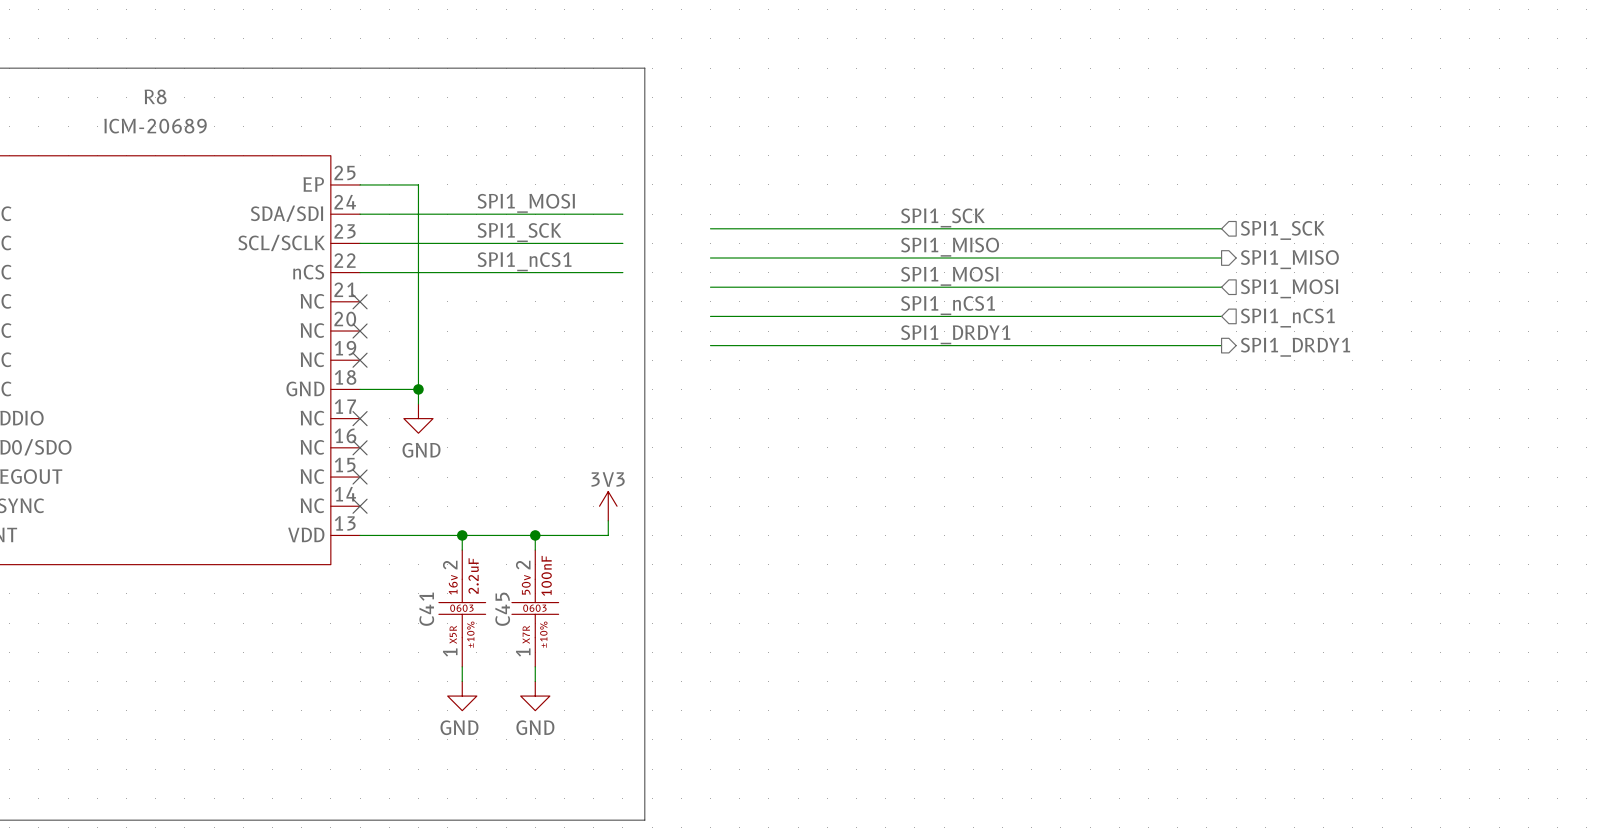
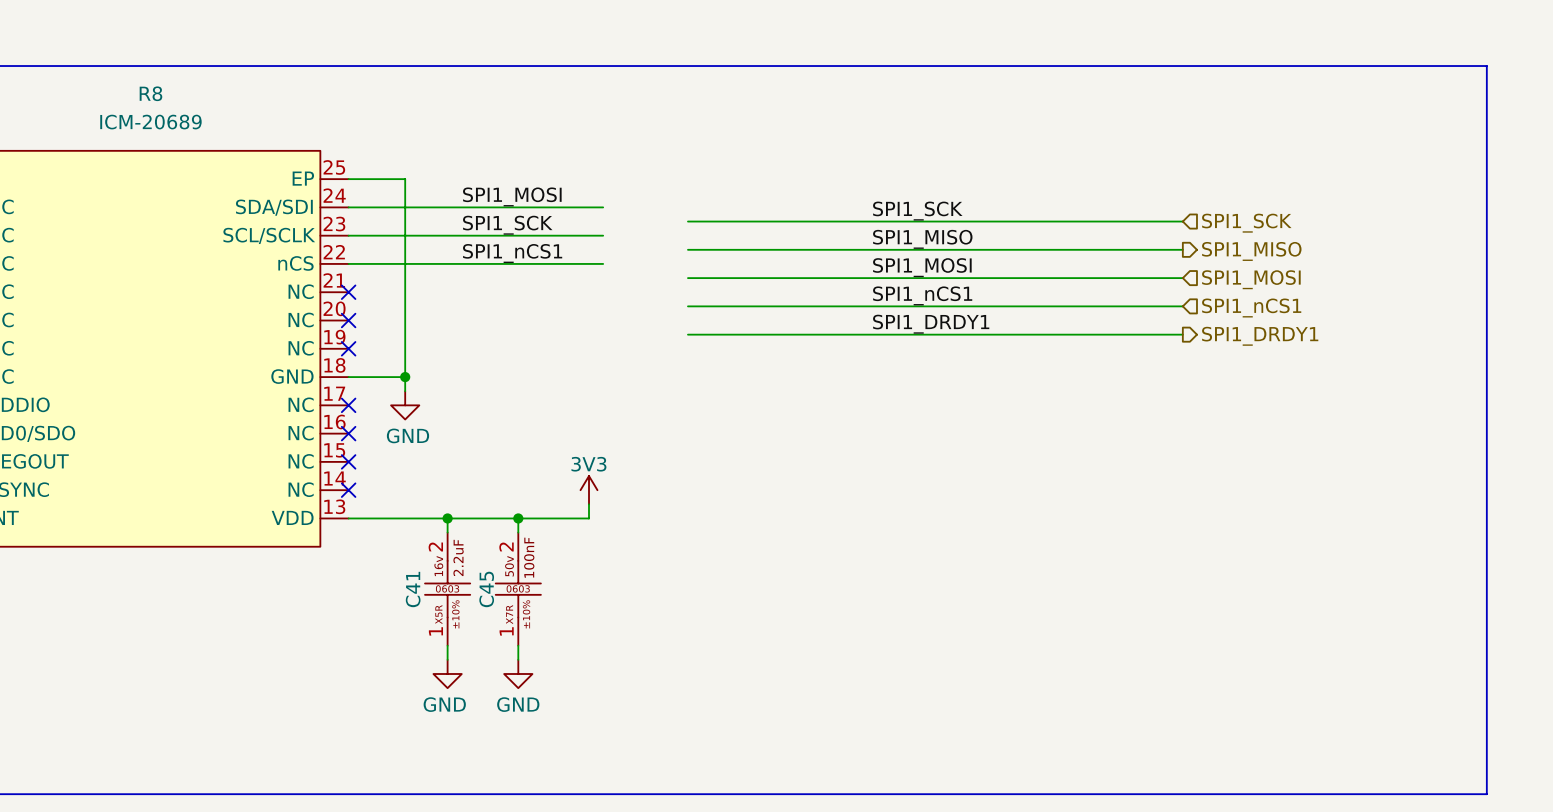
line: (644, 68) (644, 820) -> (624, 66) (1486, 66) (1486, 794) (624, 794)

